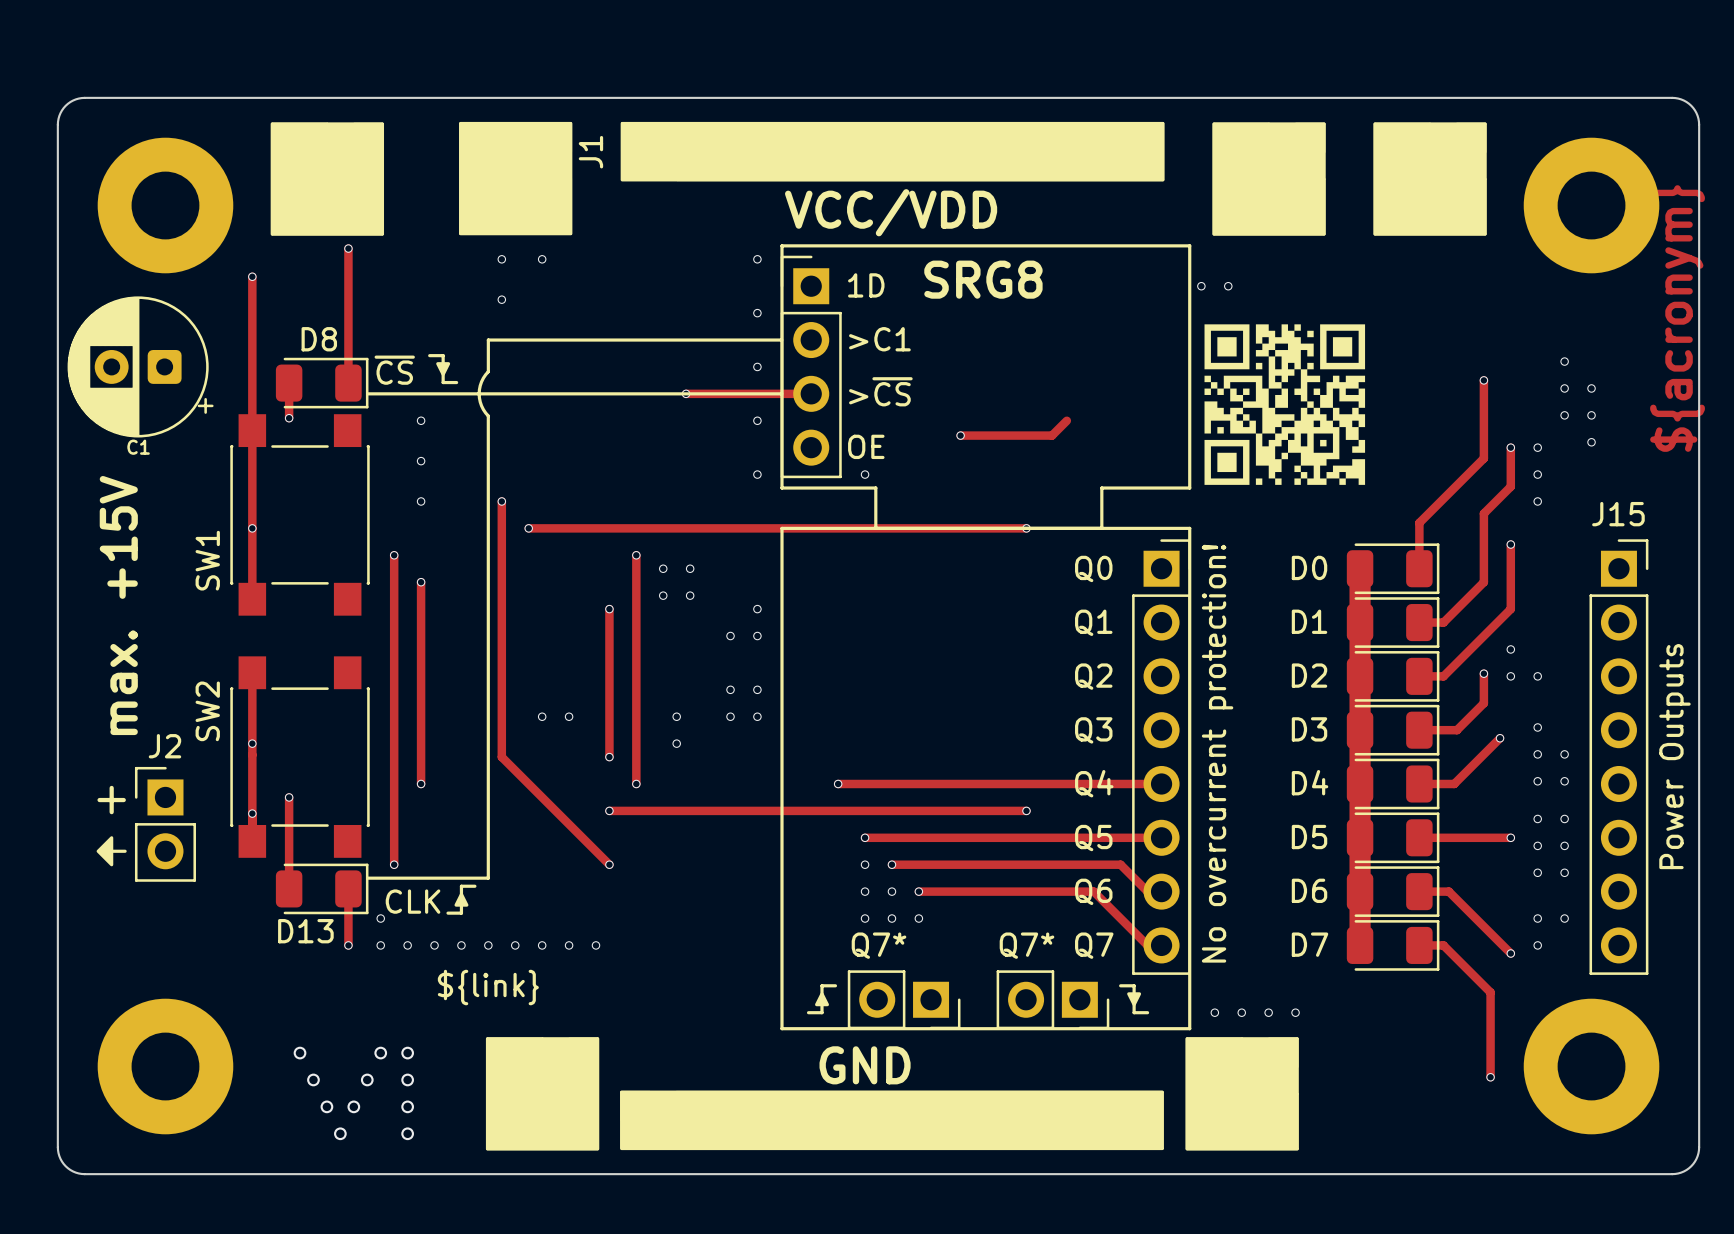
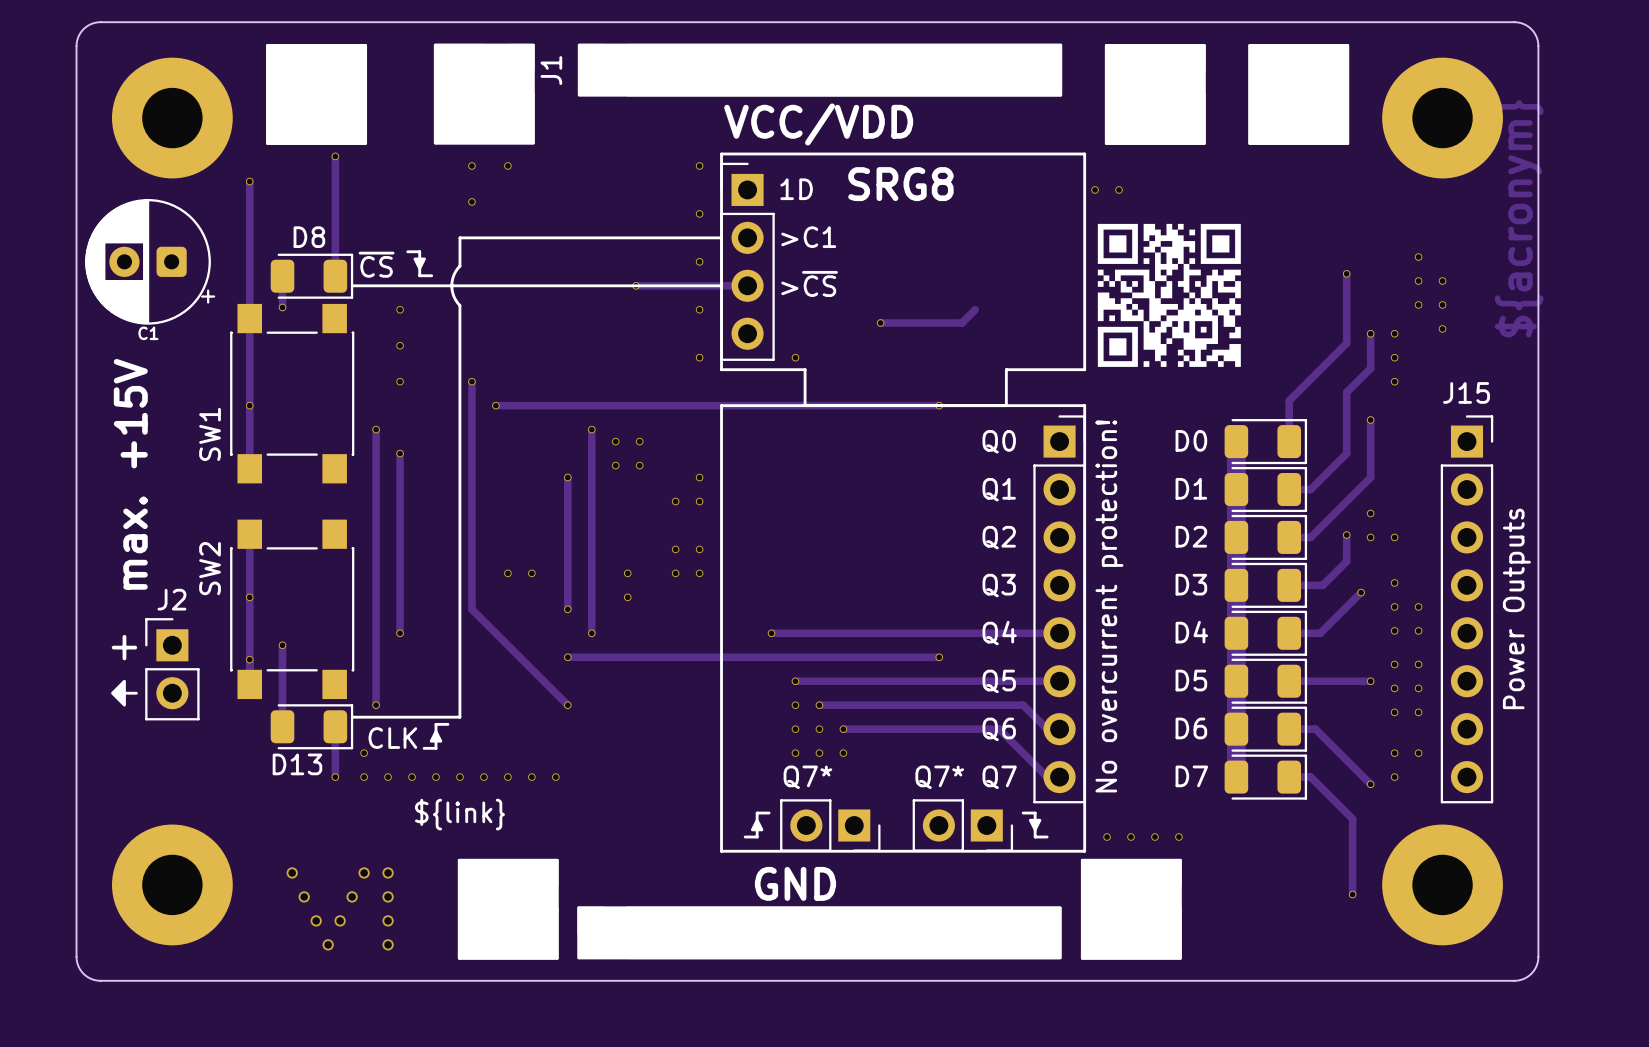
text: OE (866, 446) -> none

